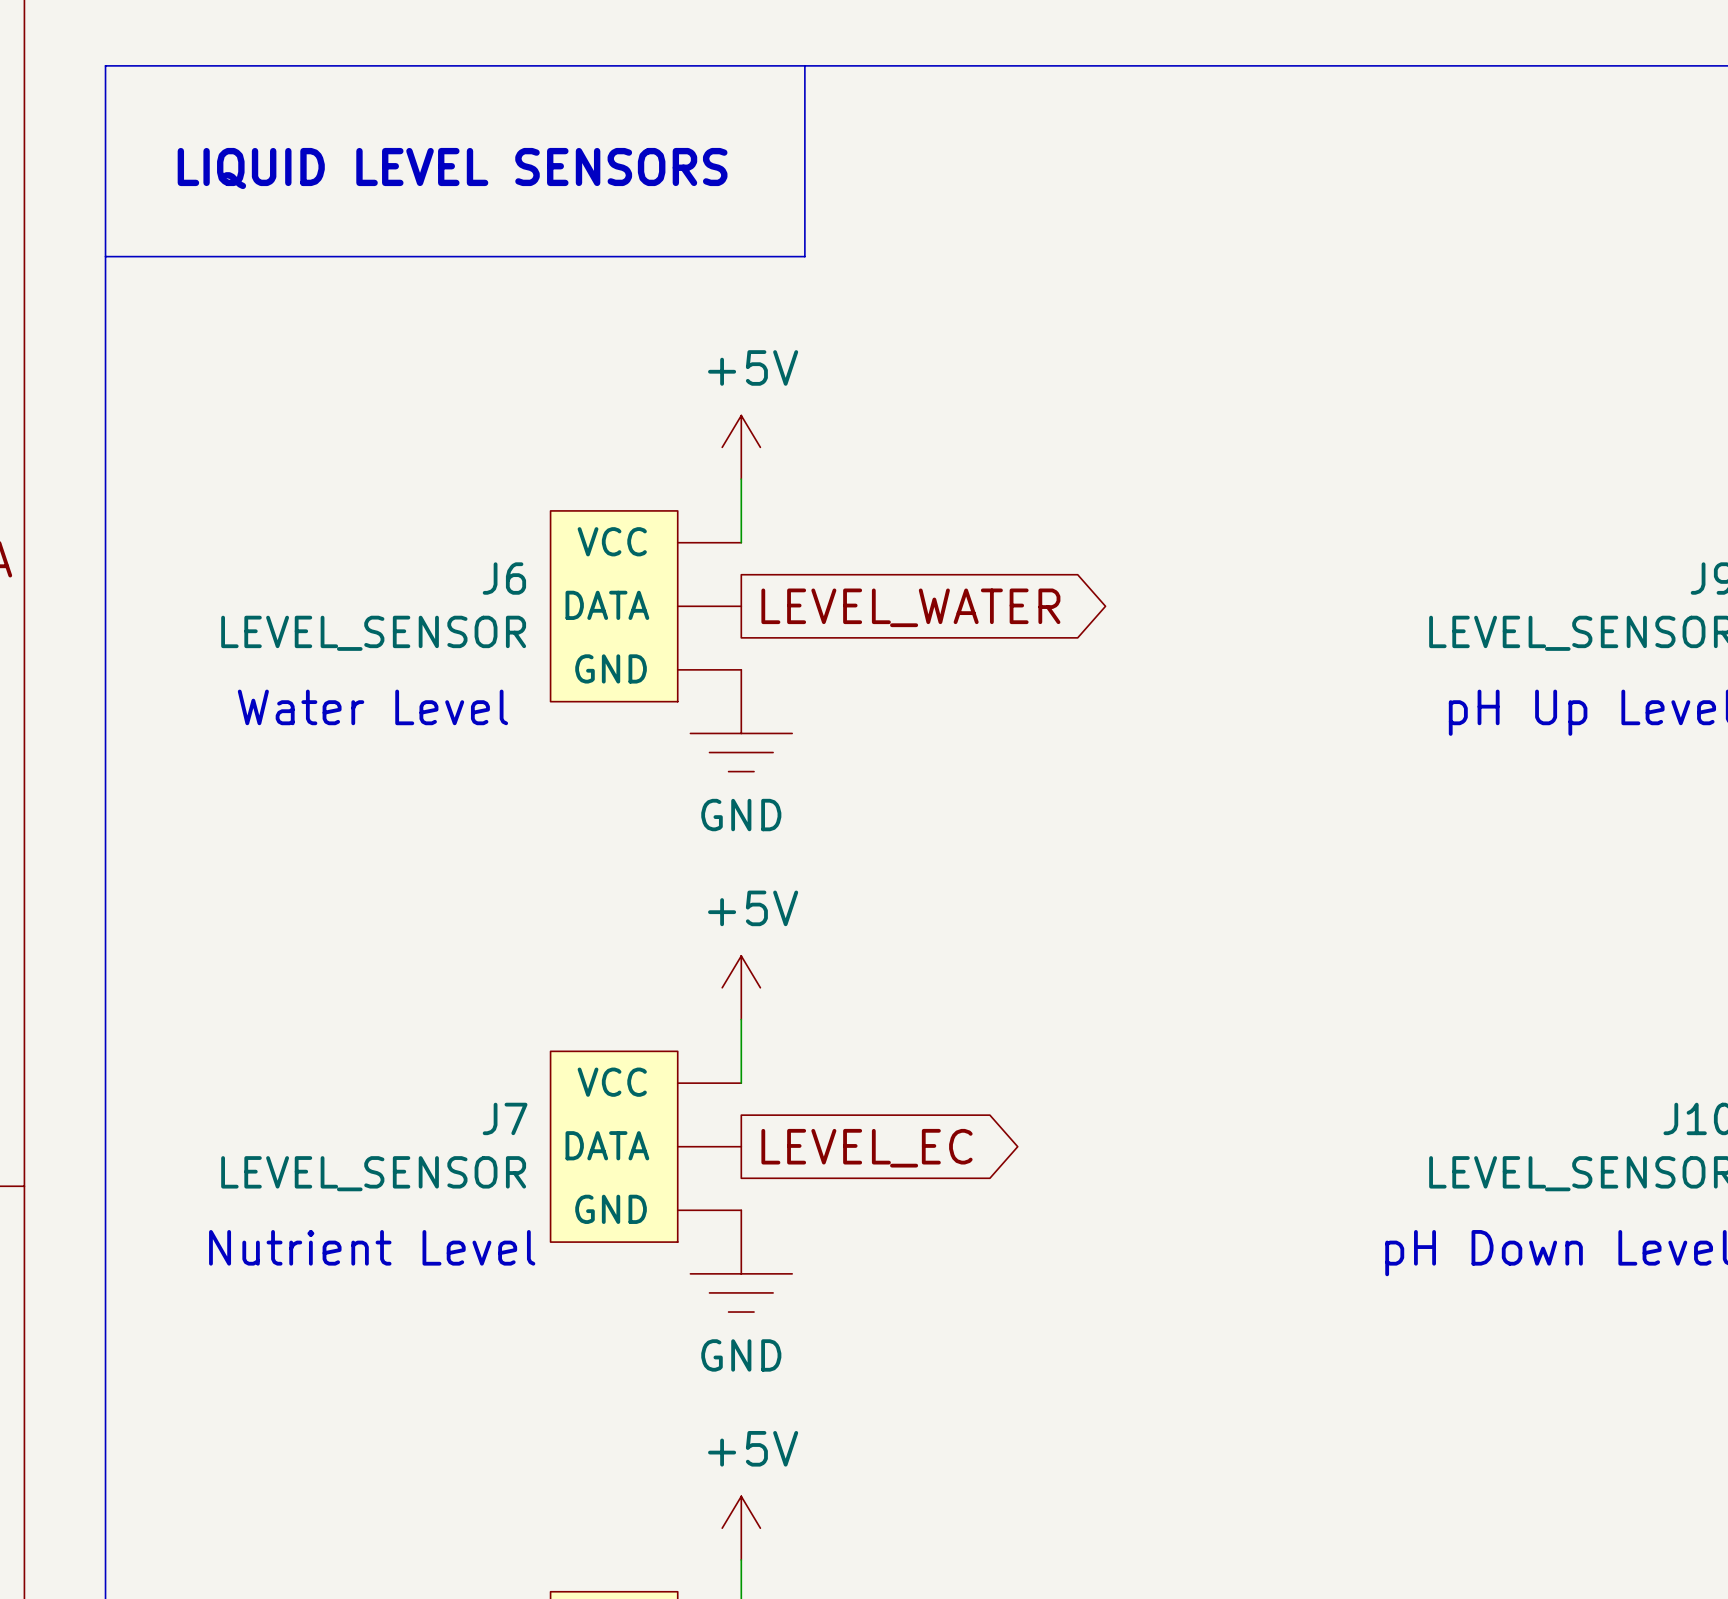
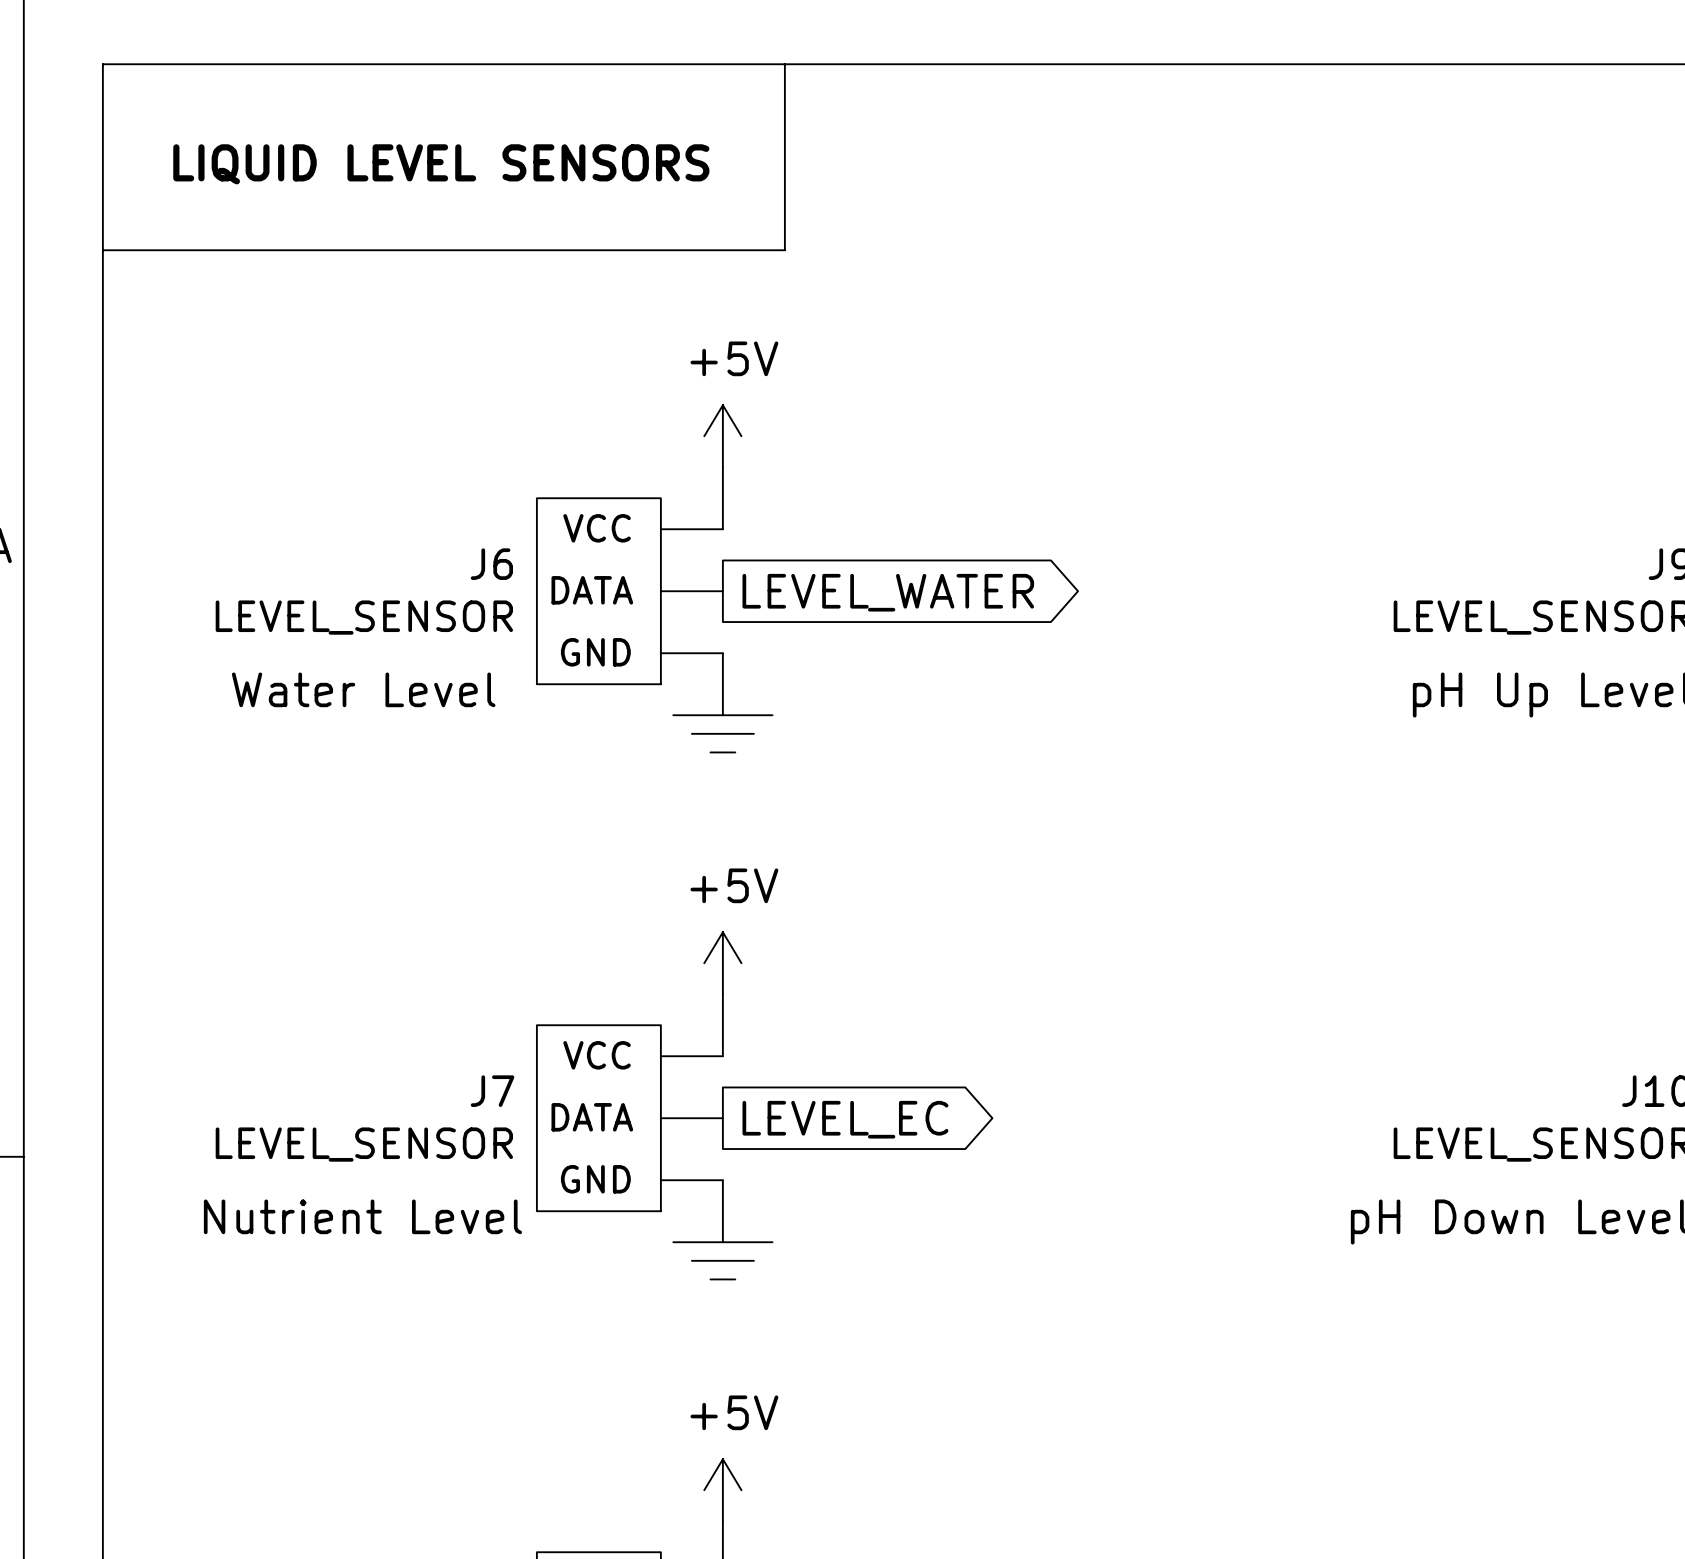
power symbol text: GND (741, 815) -> none
power symbol text: GND (741, 1355) -> none

